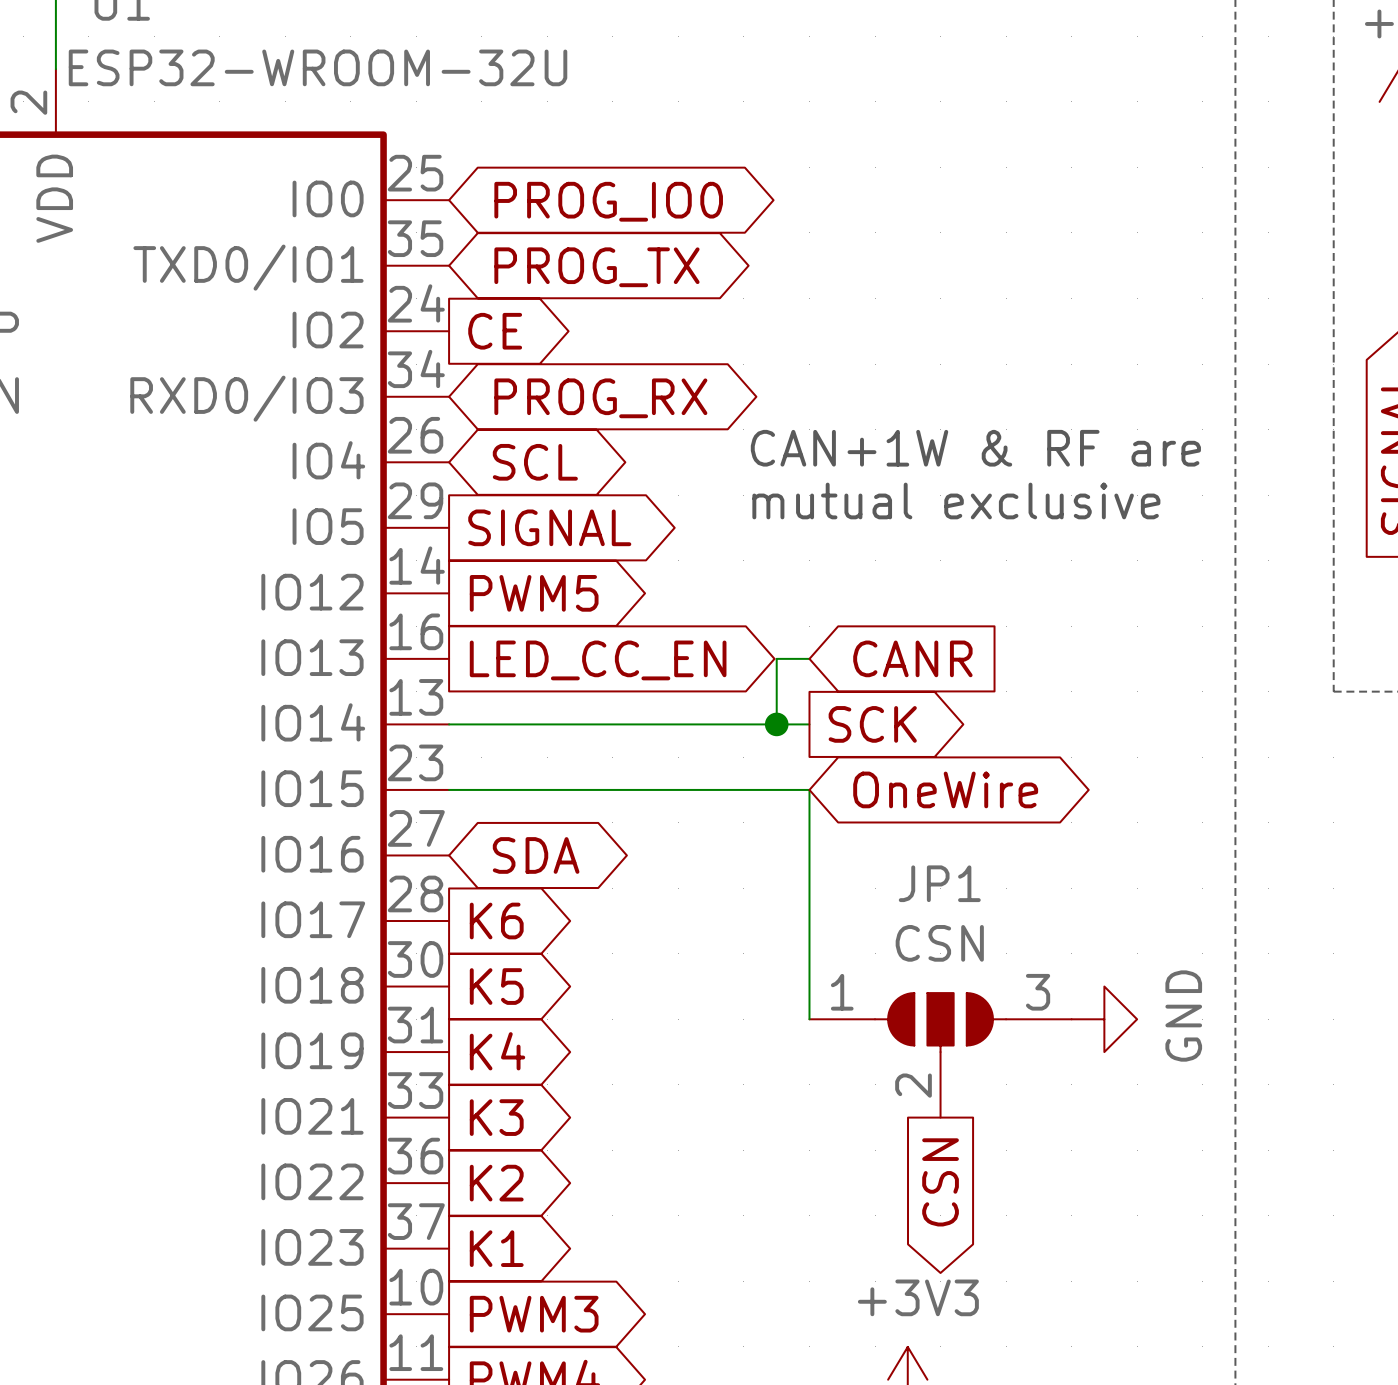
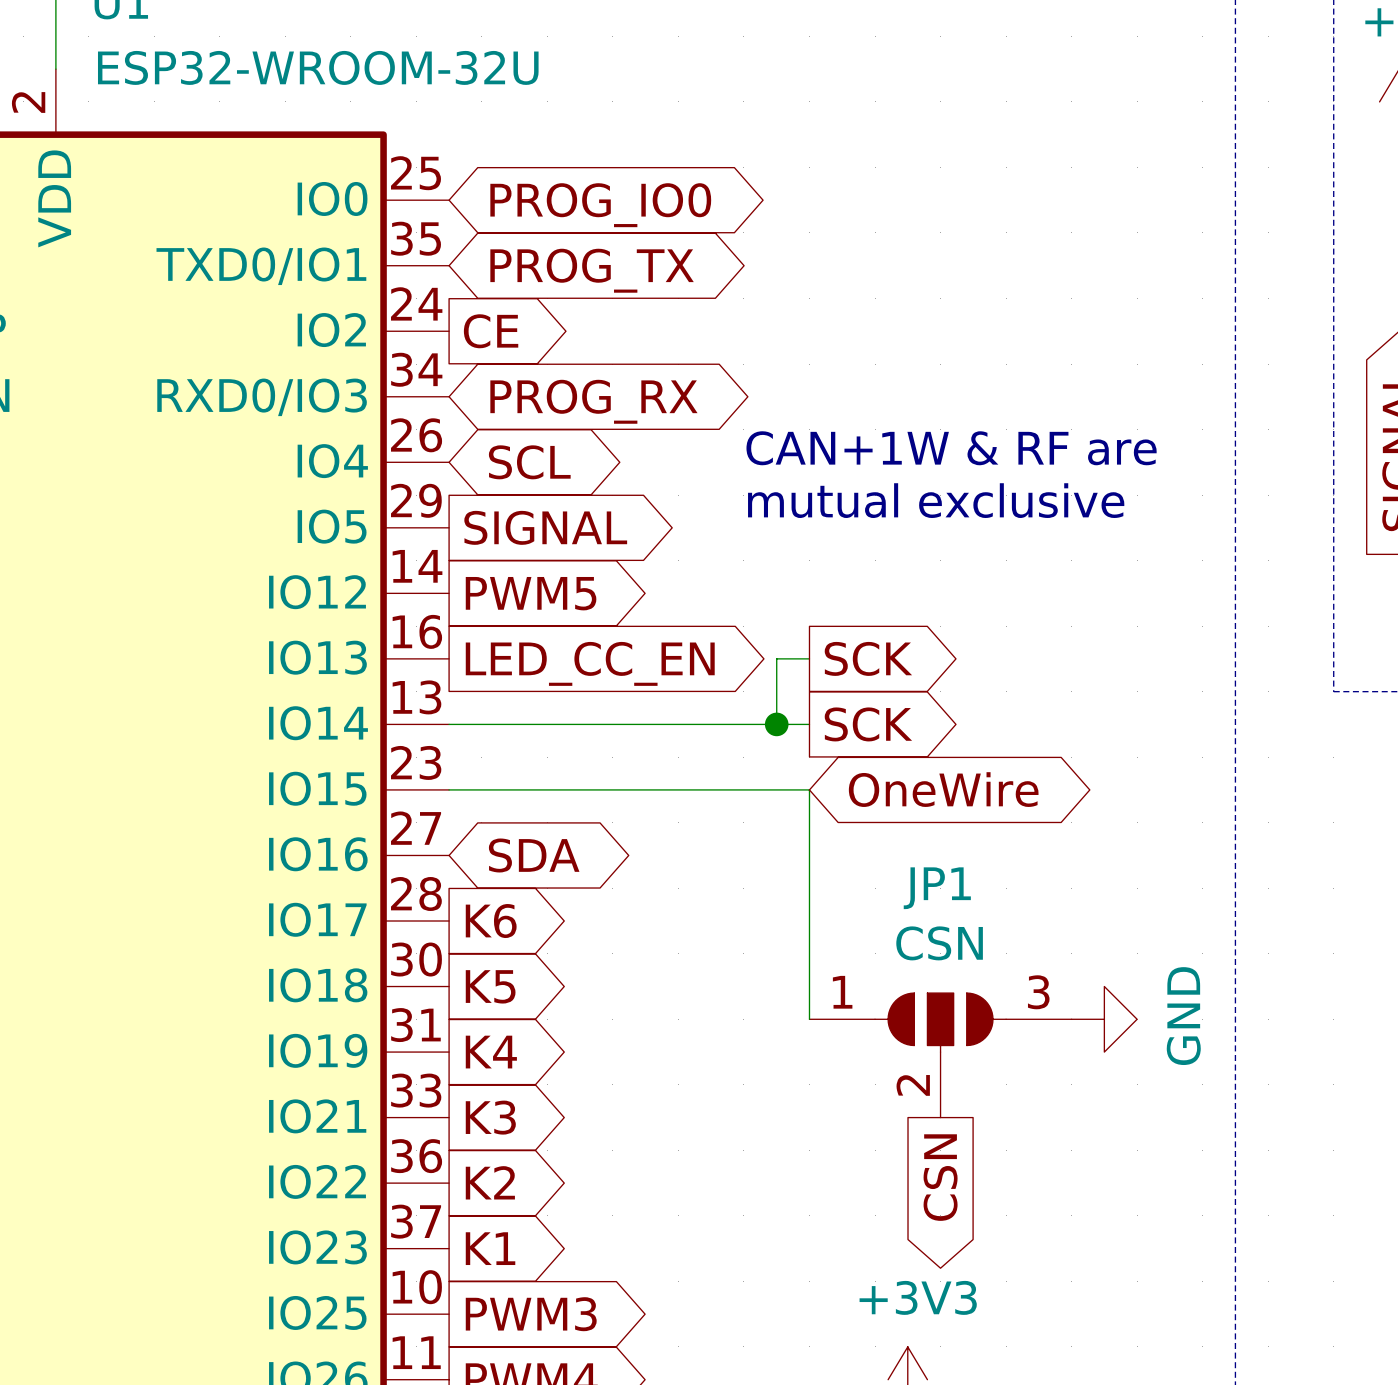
global label shape: input (912, 658) -> output (868, 658)
global label: CANR (912, 658) -> SCK (868, 658)

